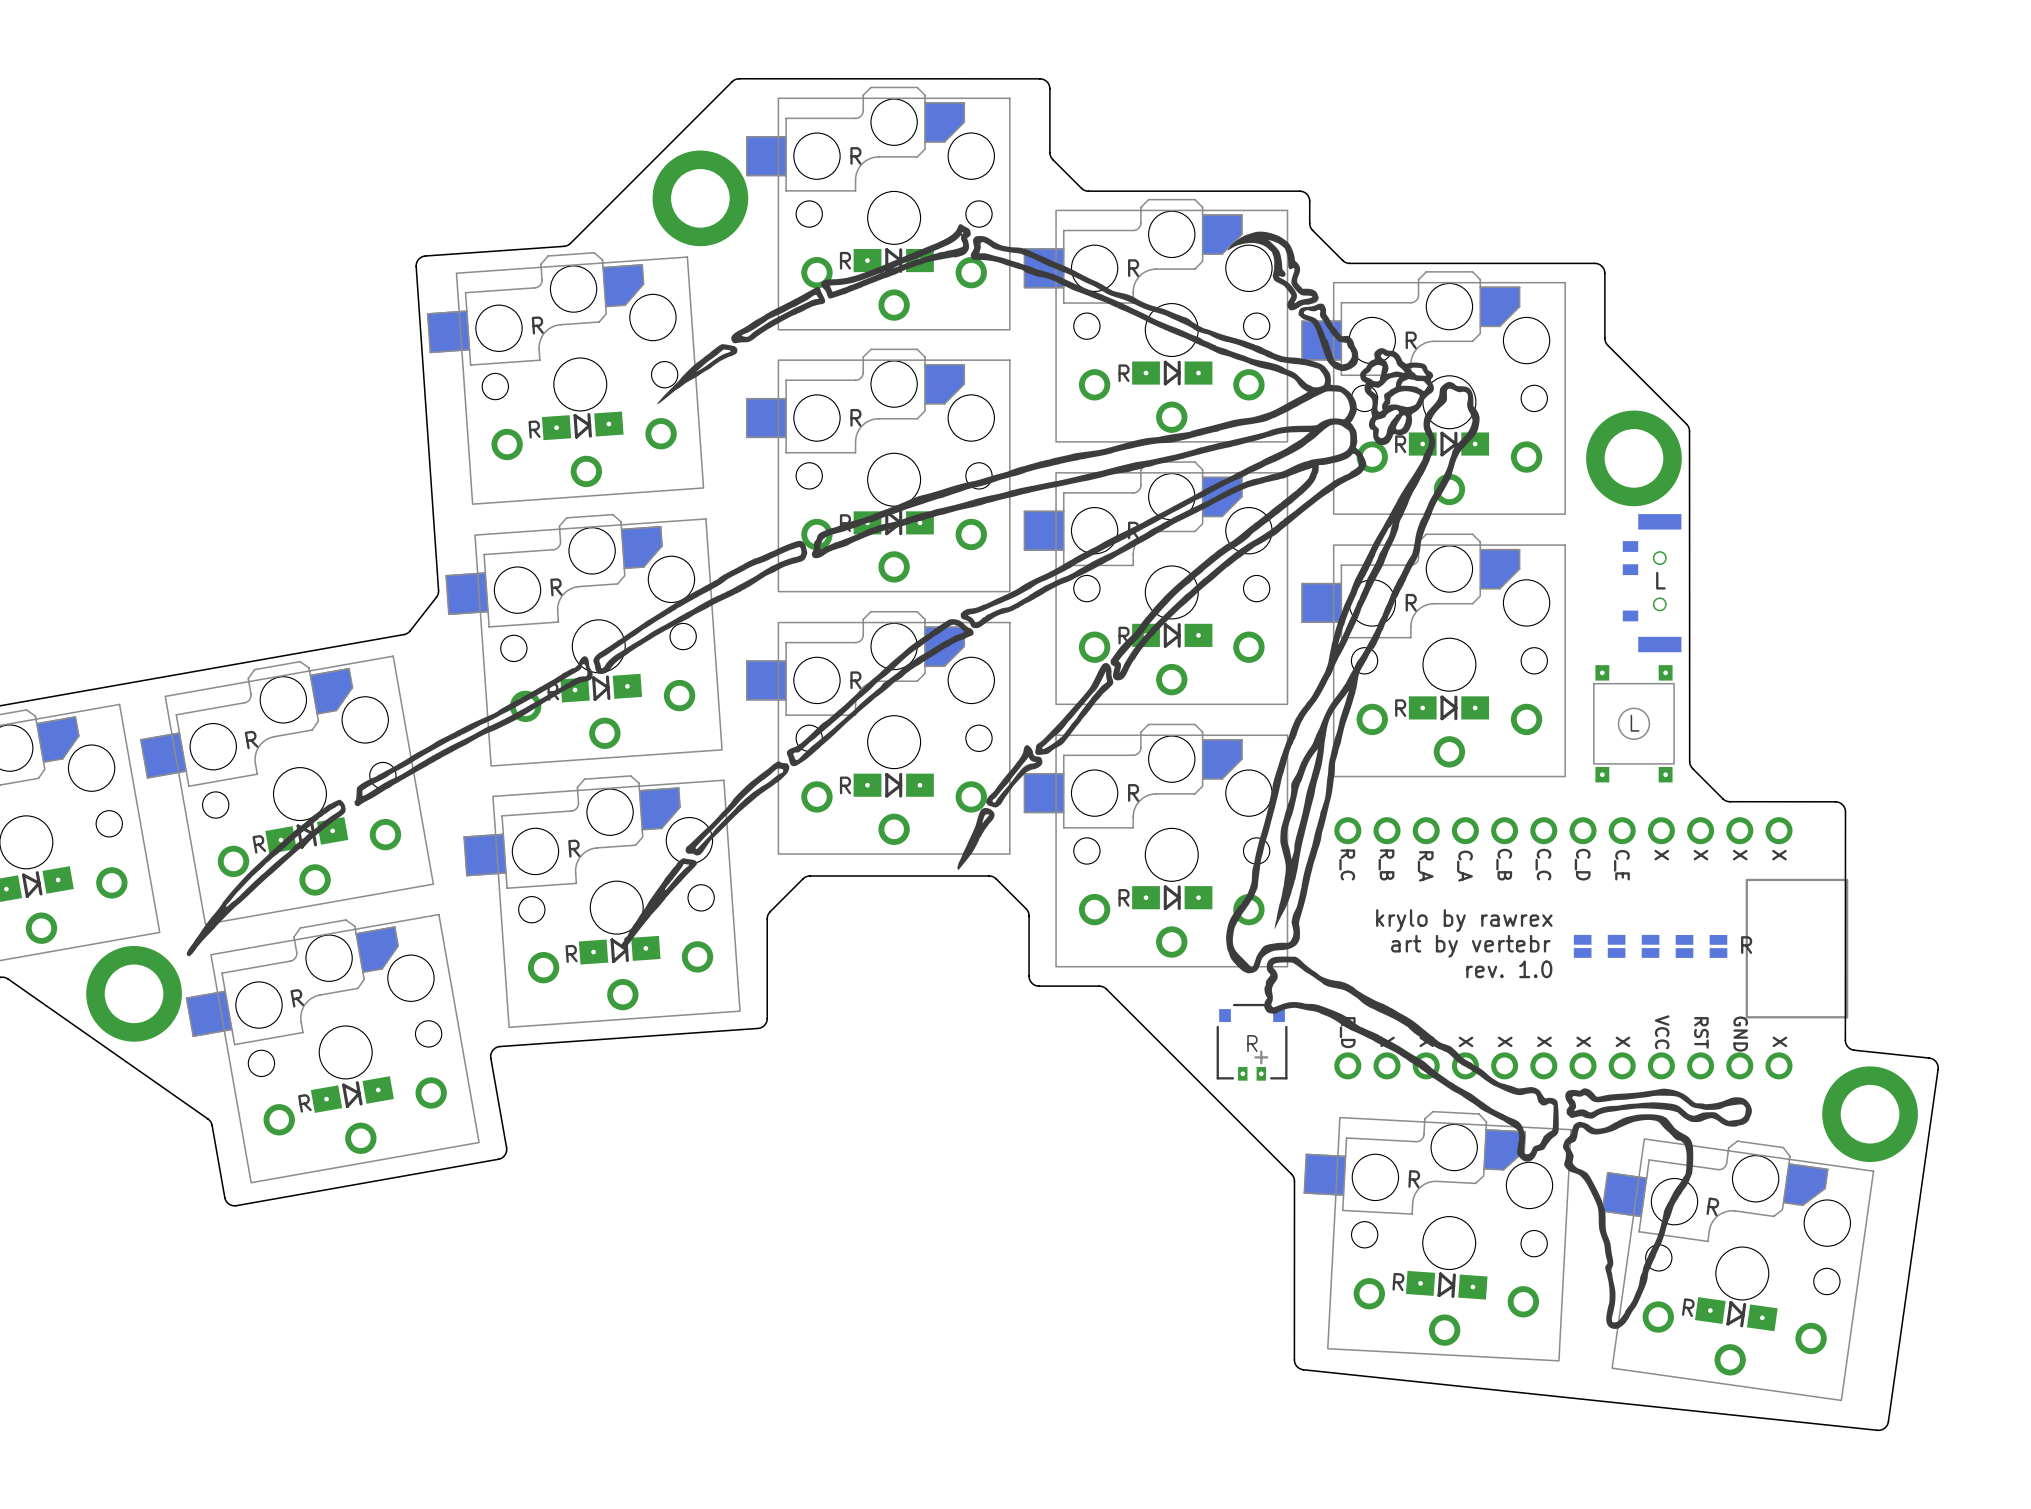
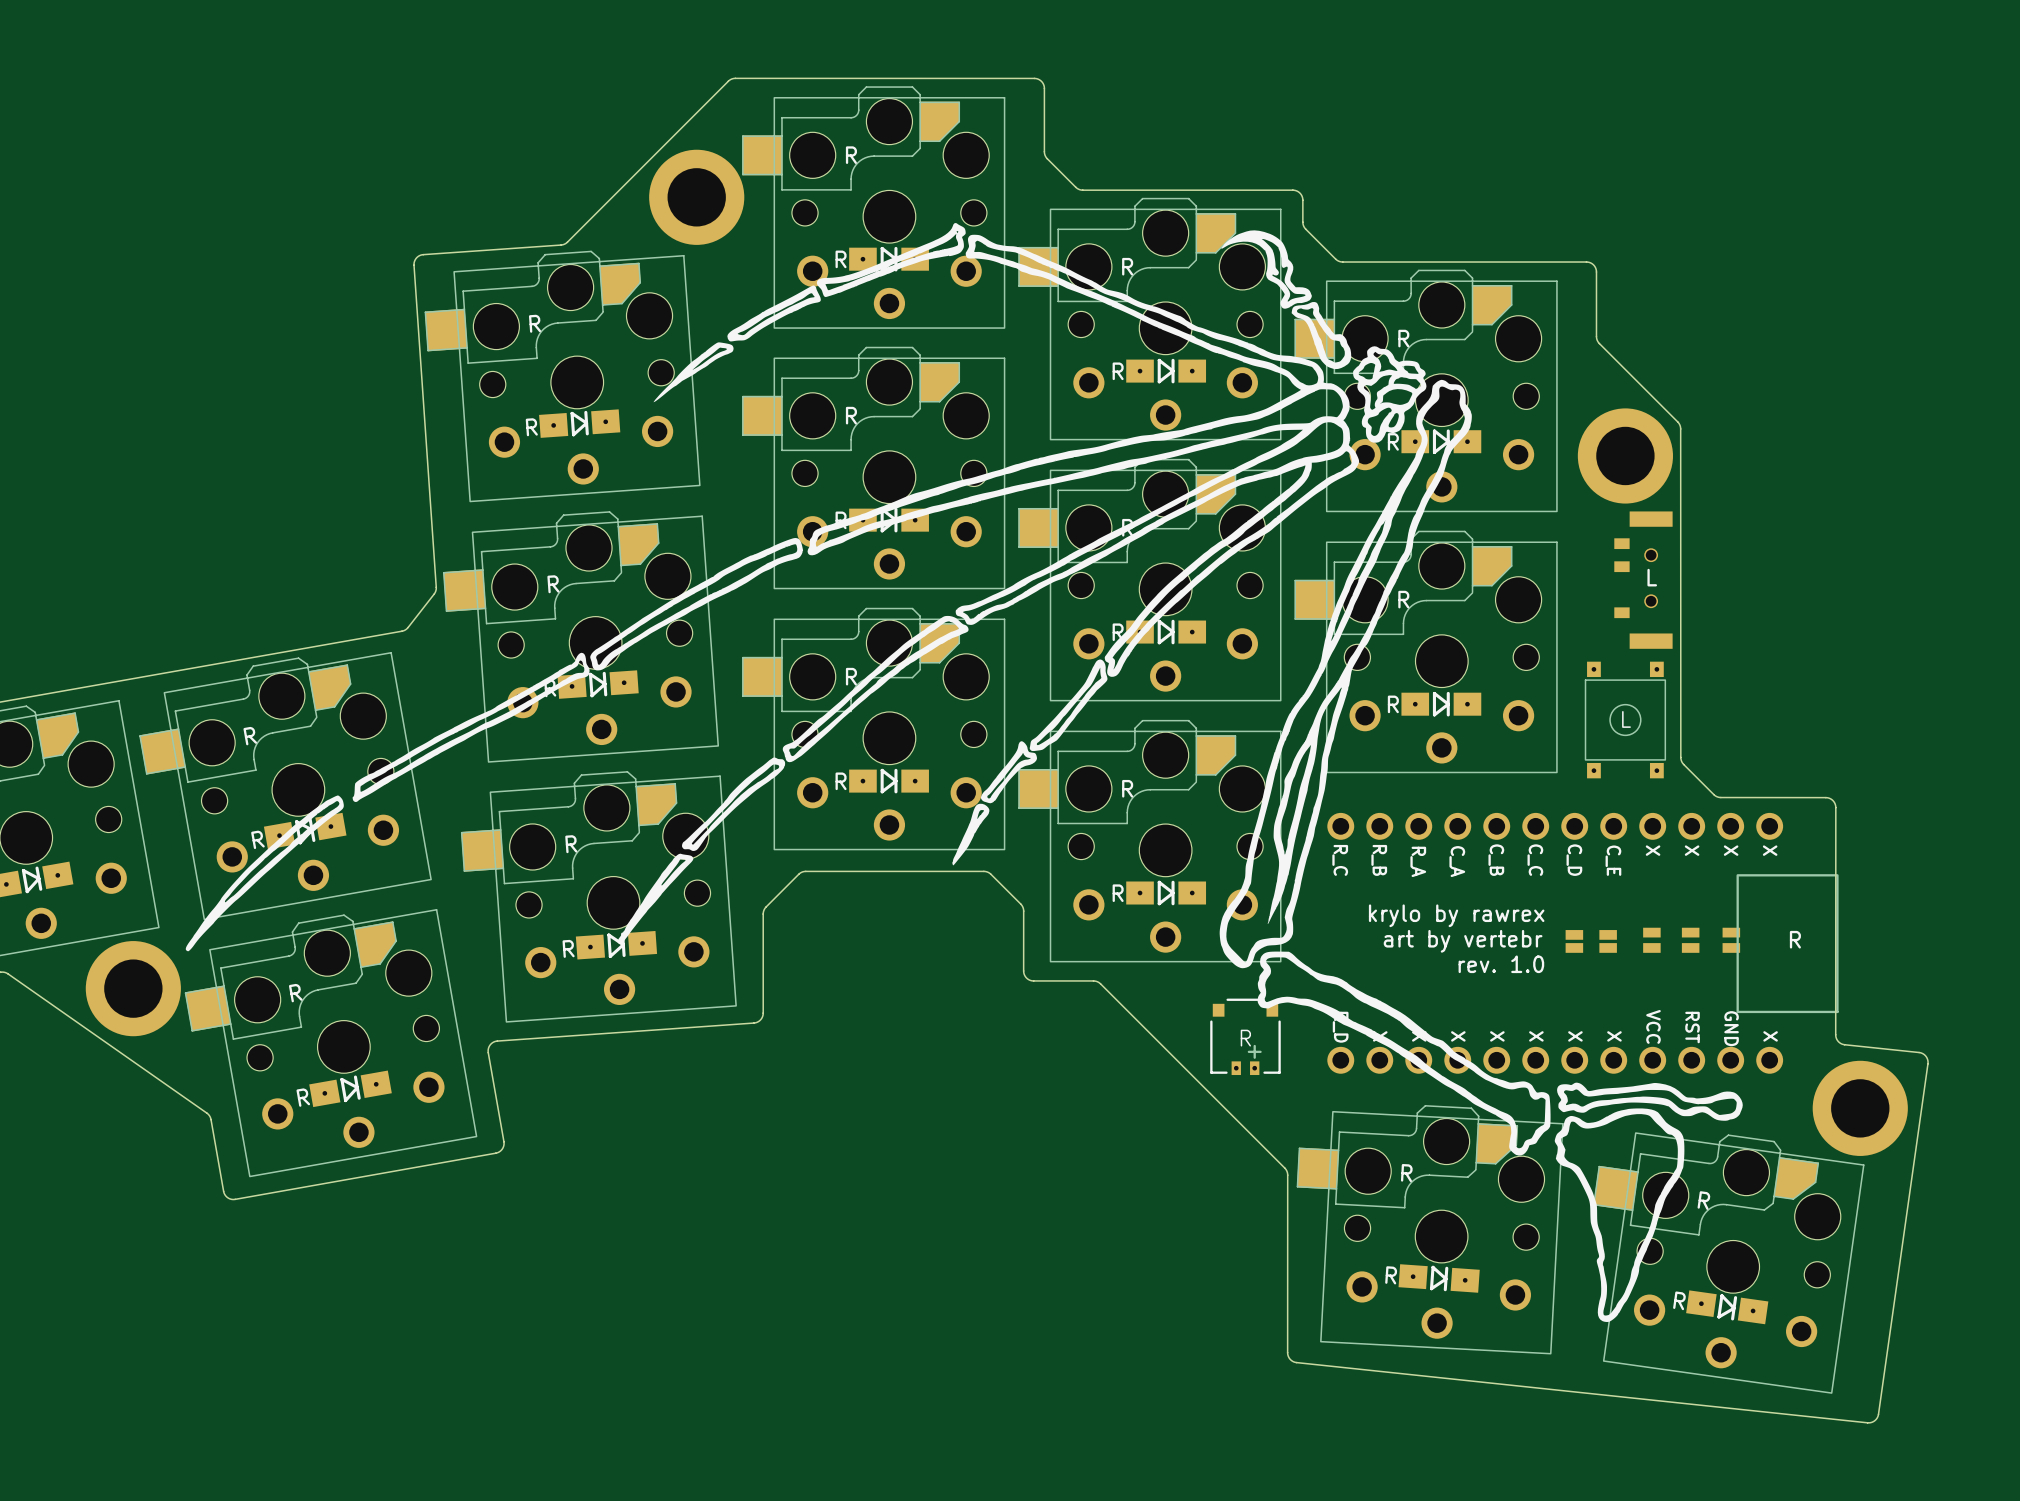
part footprint: [1641, 934, 1660, 958] -> [1643, 927, 1661, 953]
part: none -> (1690, 940)
part: none -> (1731, 940)
text position: R (1746, 945) -> R (1795, 939)
part: (1684, 946) -> none
part: (1718, 946) -> none

